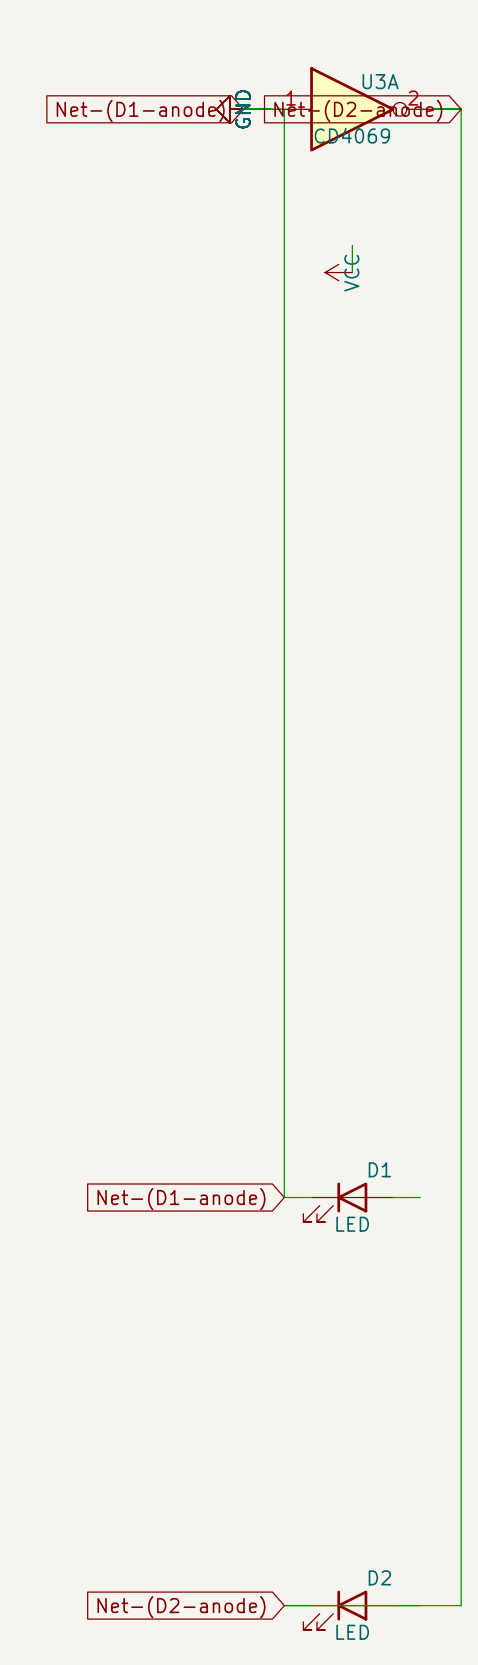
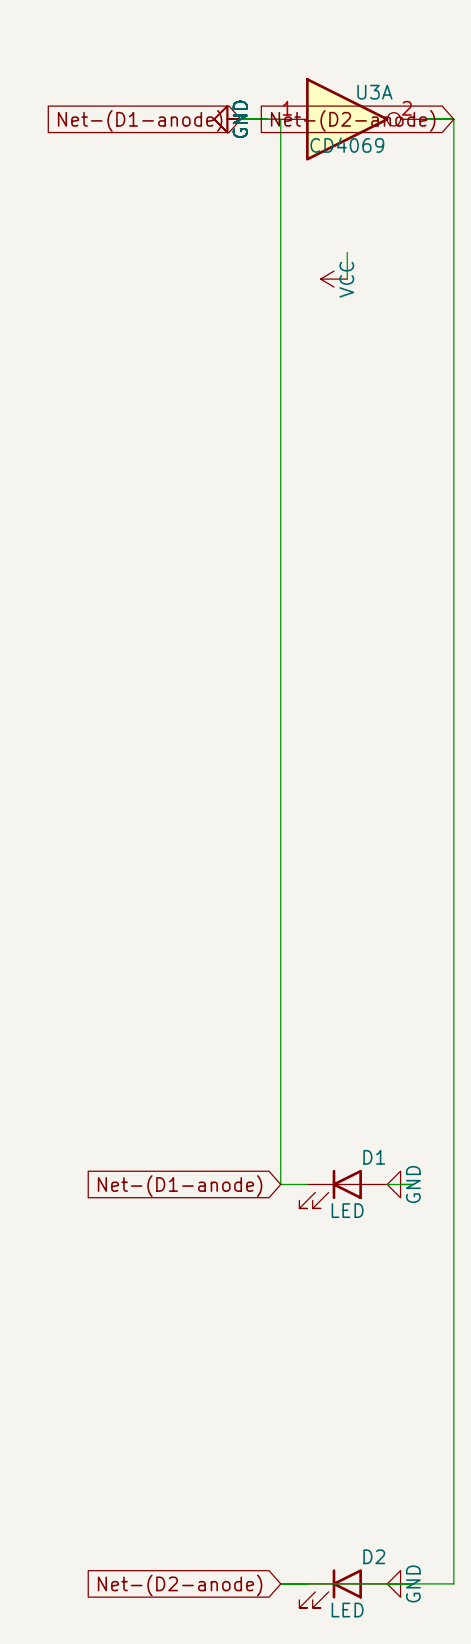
power symbol: none -> GND (400, 1184)
power symbol: none -> GND (400, 1583)

